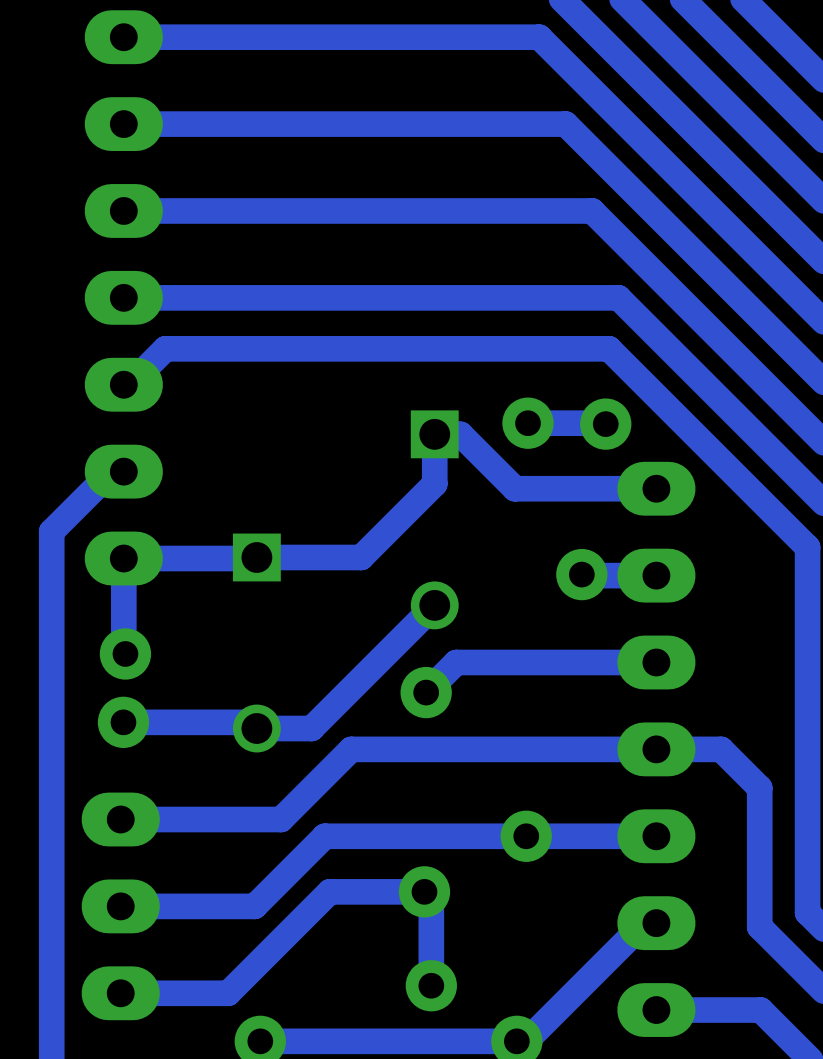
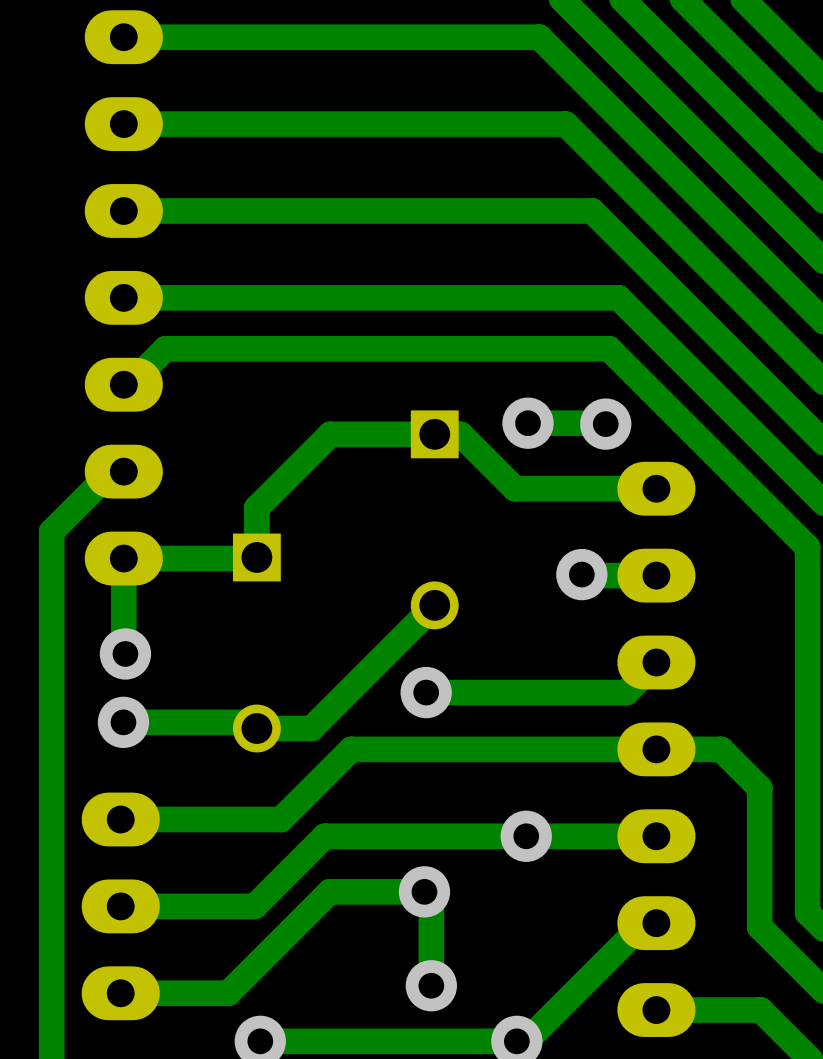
track: (434, 434) (434, 483) (361, 557) (256, 557) -> (434, 434) (330, 434) (256, 507) (256, 557)
track: (656, 662) (456, 662) (426, 692) -> (656, 662) (626, 692) (426, 692)

